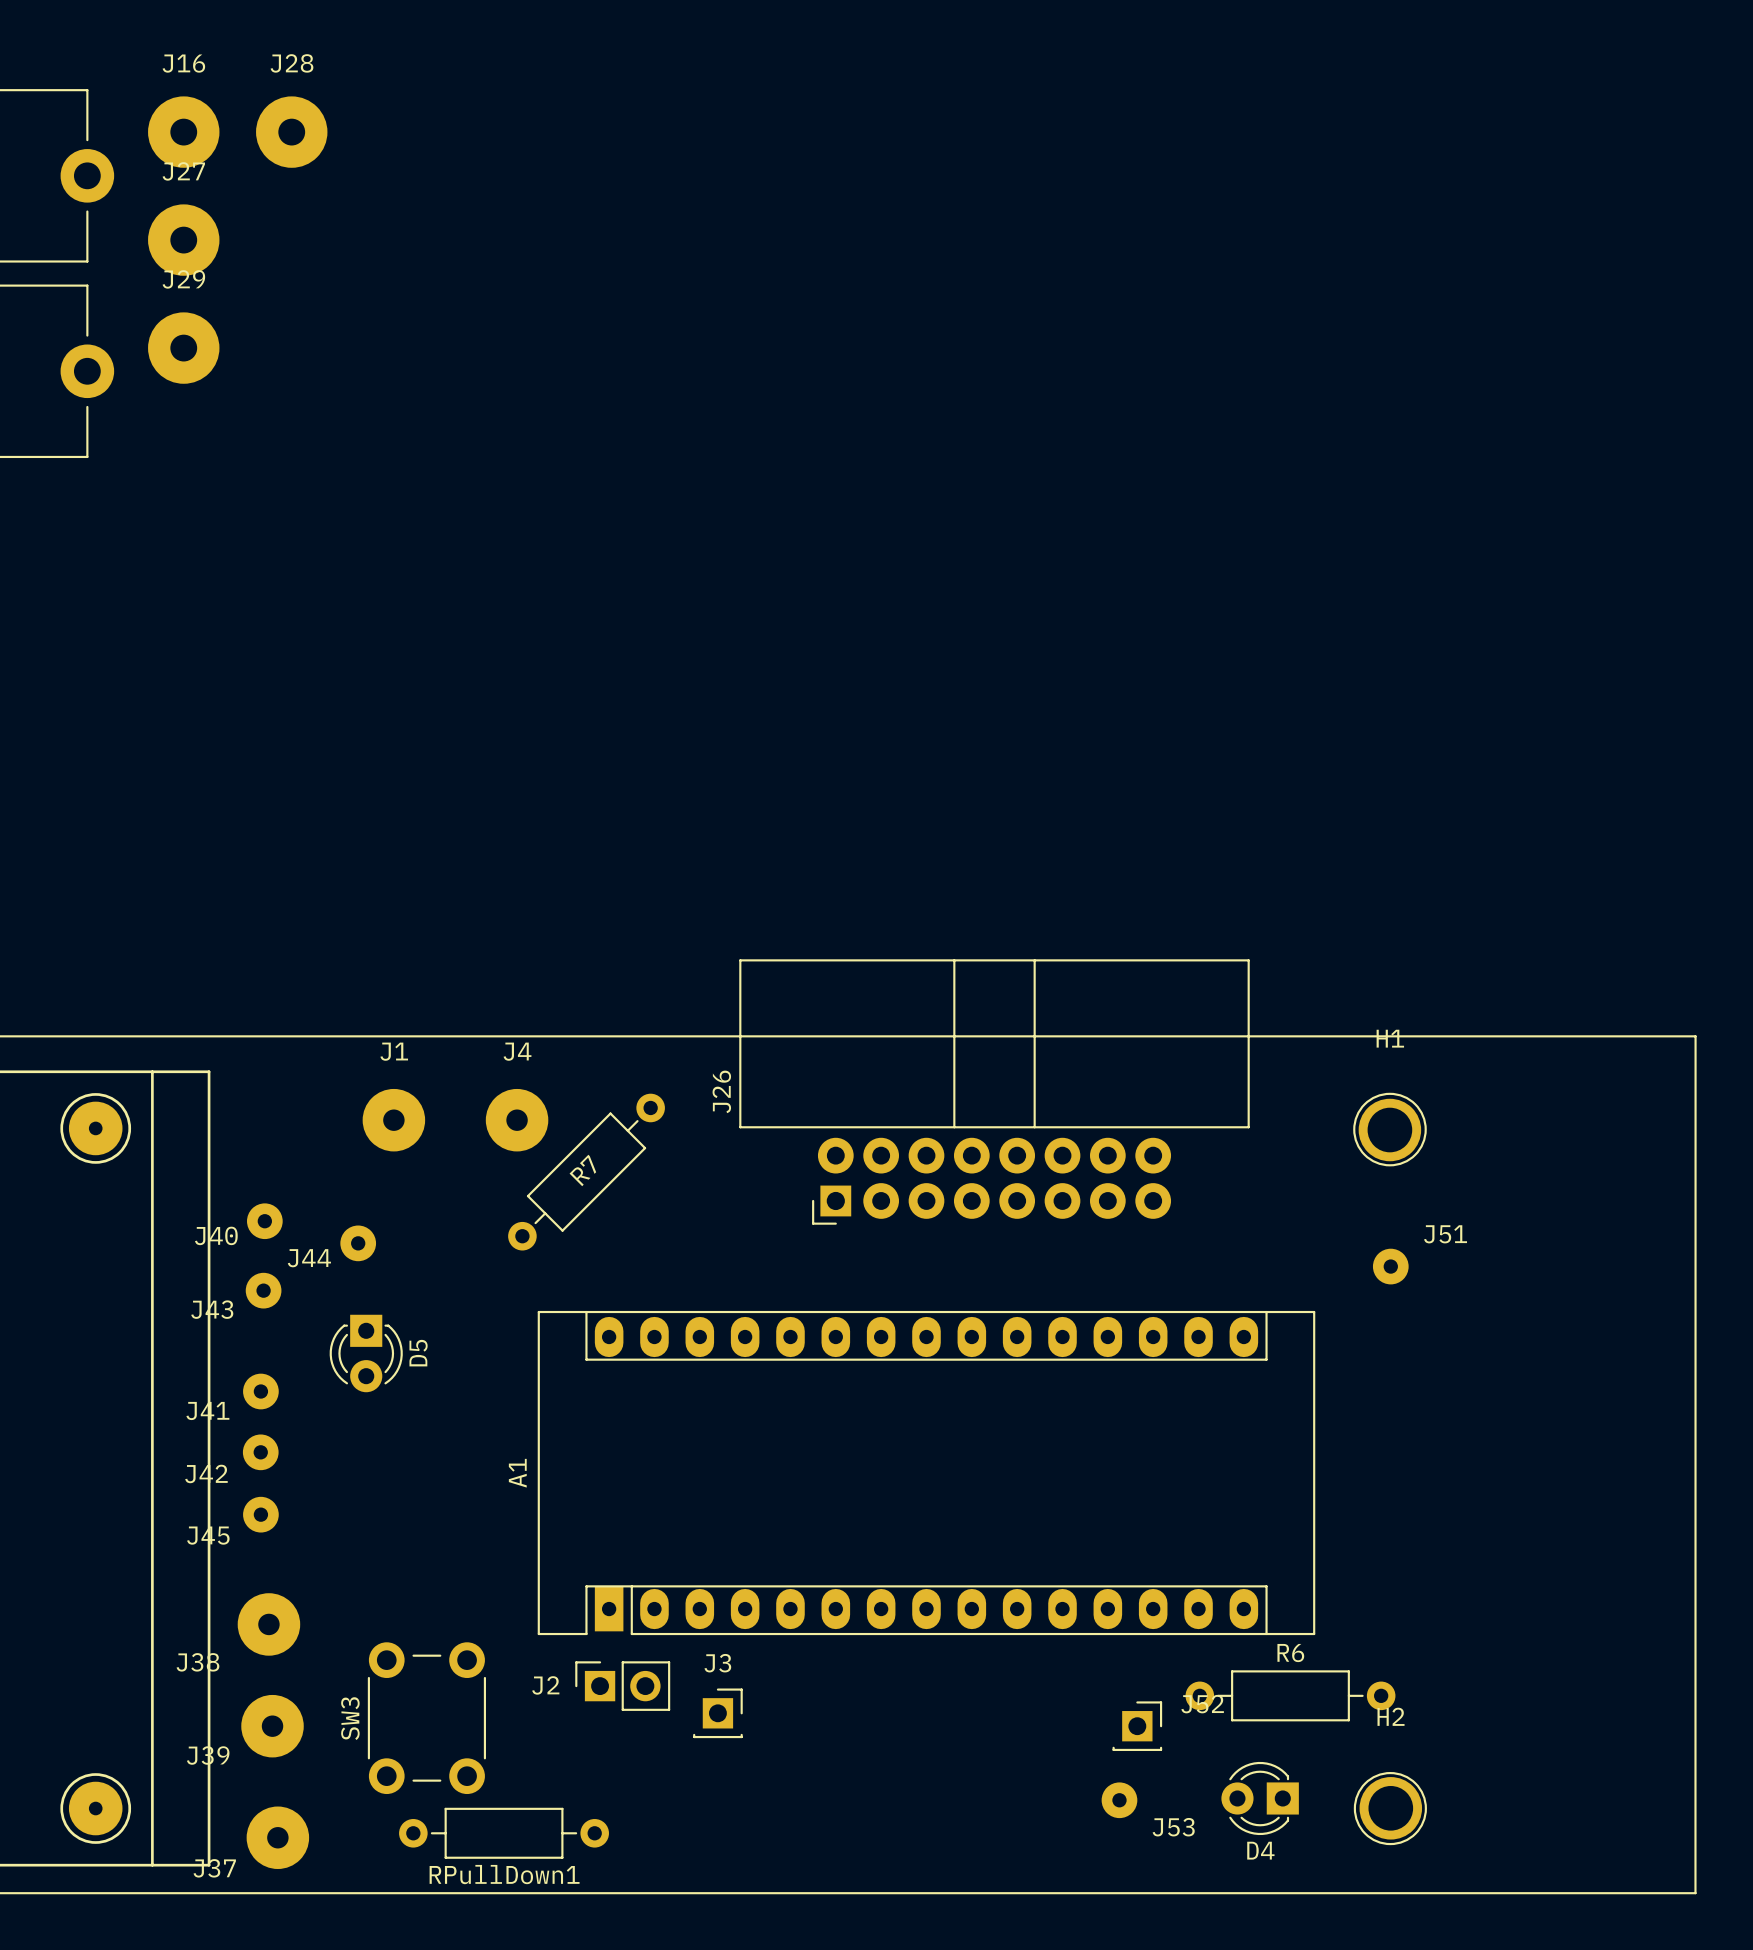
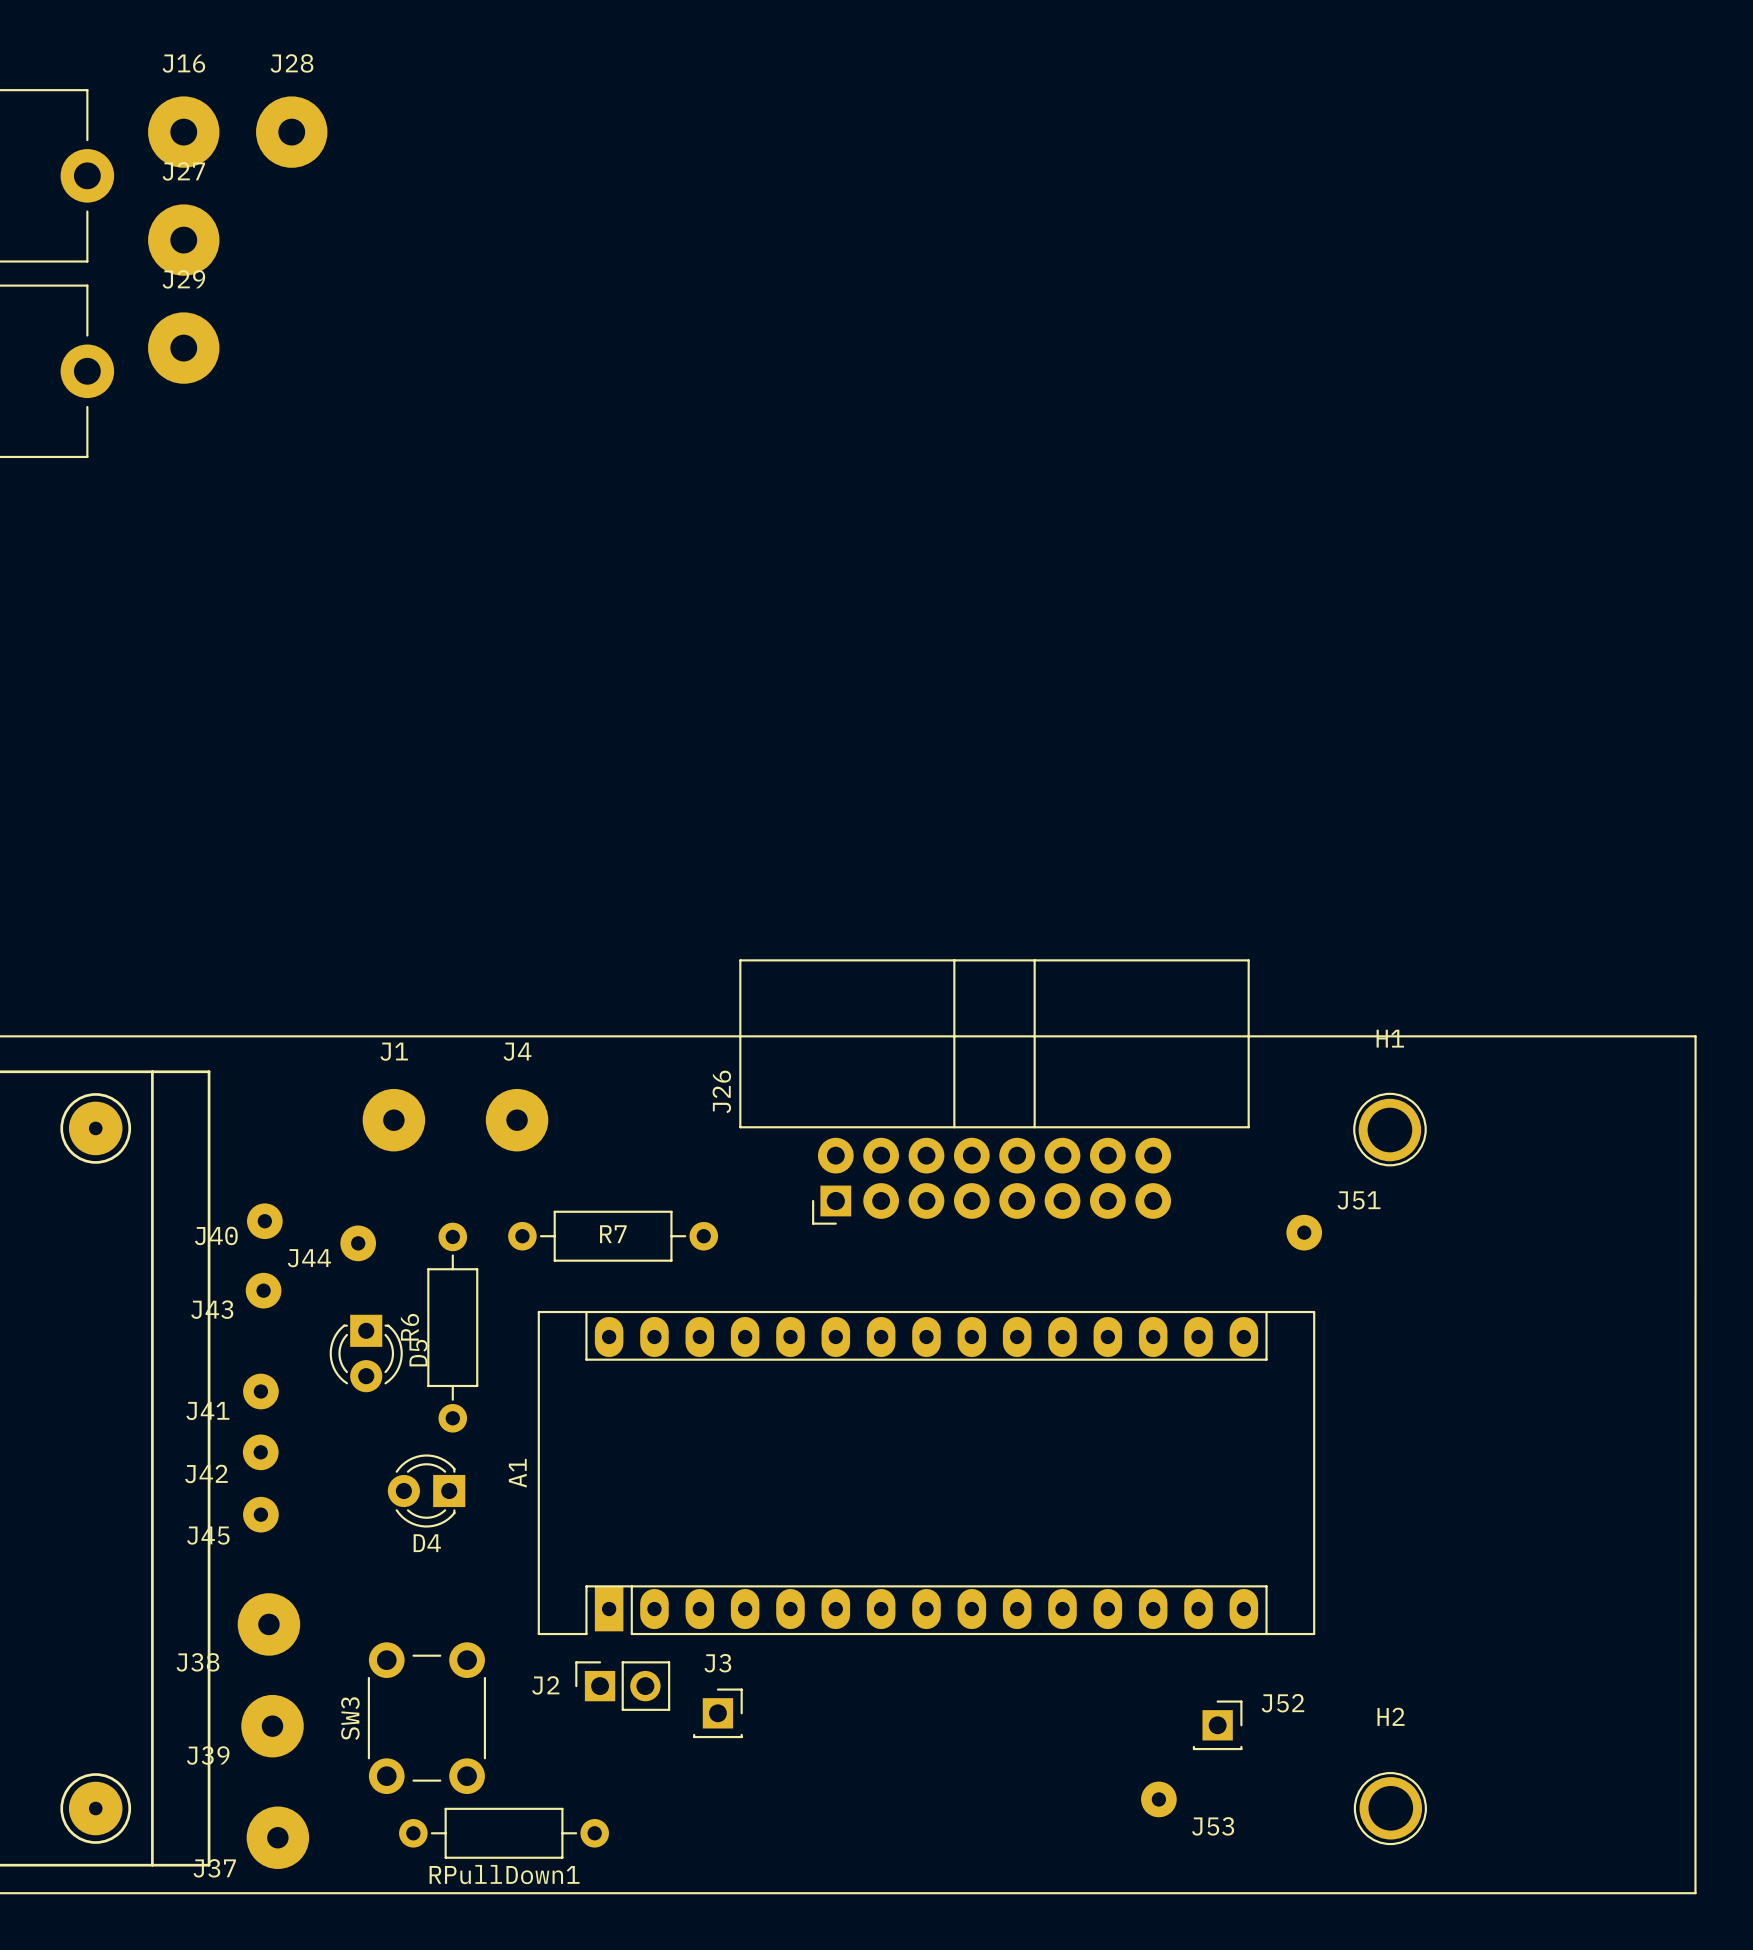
R7 rotation: 0° (586, 1172) -> 45° clockwise (613, 1236)
J51 position: (1390, 1266) -> (1304, 1232)
R6 name position: R6 (1290, 1653) -> R6 (409, 1327)
R6 rotation: 0° (1290, 1695) -> 90° clockwise (452, 1327)
R6 position: (1290, 1695) -> (452, 1327)
J52 position: (1137, 1726) -> (1217, 1725)
D4 position: (1260, 1798) -> (426, 1491)
J53 position: (1119, 1800) -> (1158, 1799)

